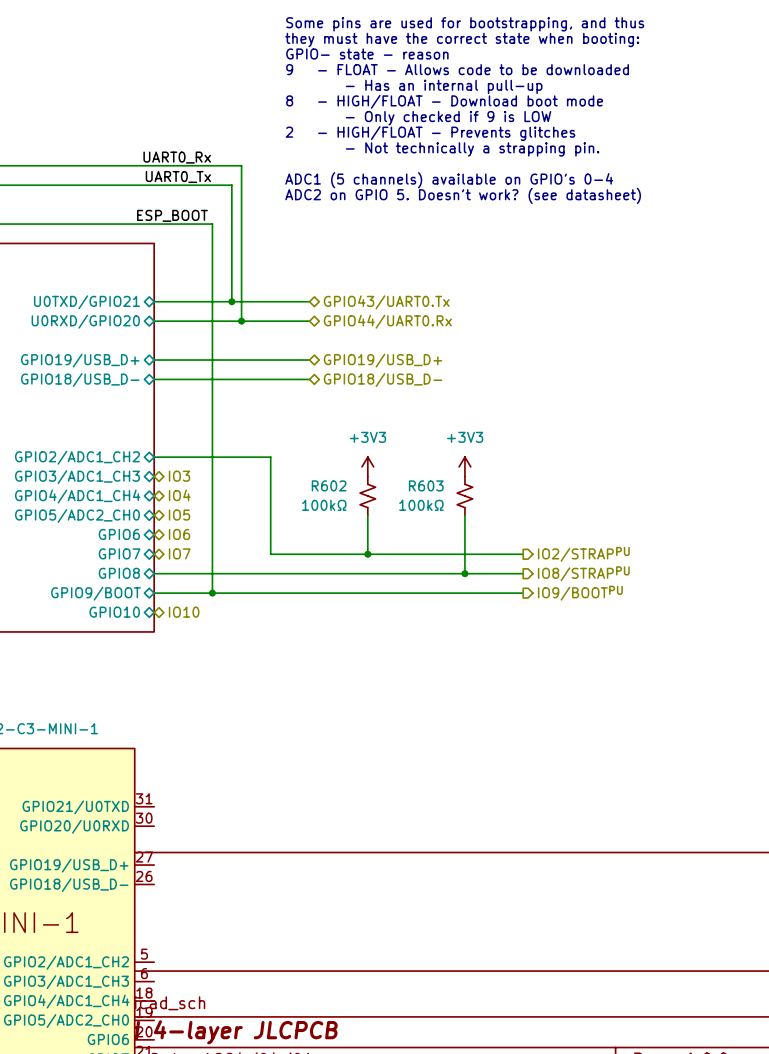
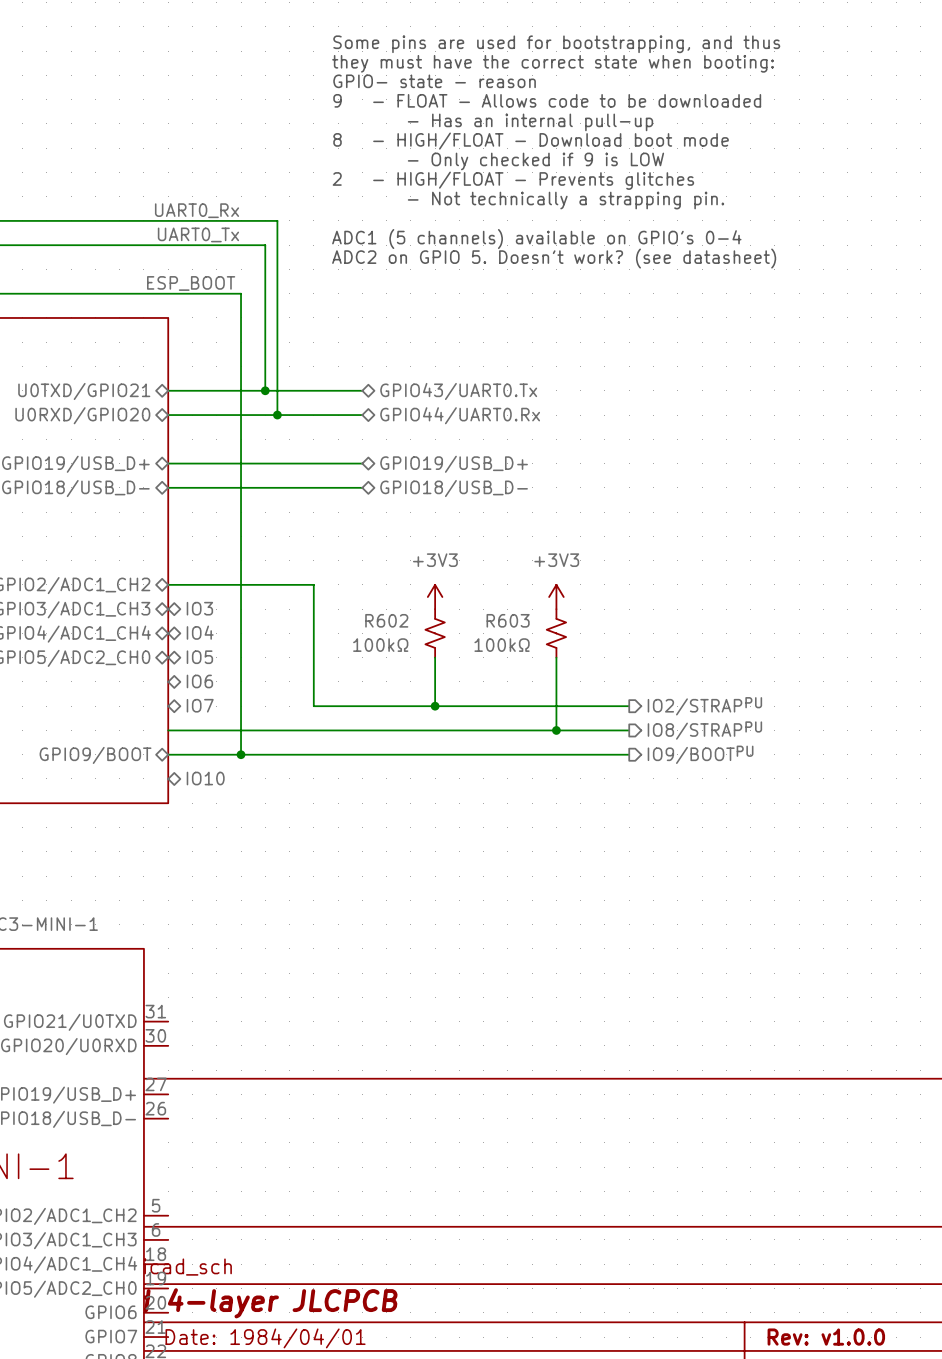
sheet pin: GPIO6 (119, 534) -> none
sheet pin: GPIO7 (119, 553) -> none
sheet pin: GPIO8 (119, 573) -> none
sheet pin: GPIO10 (114, 612) -> none

